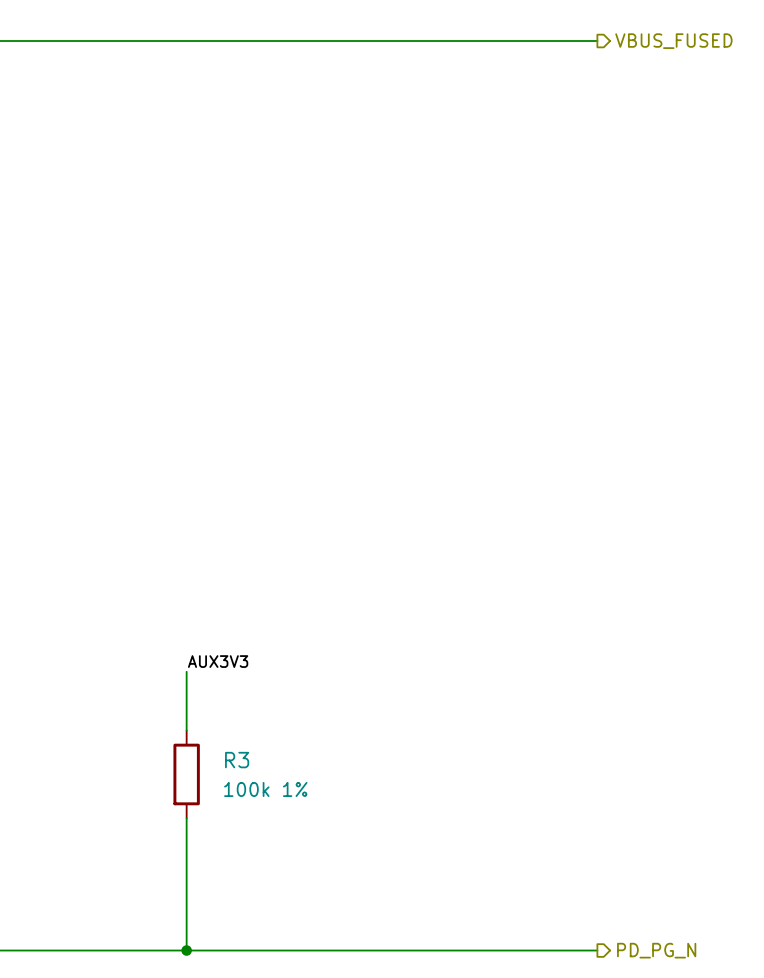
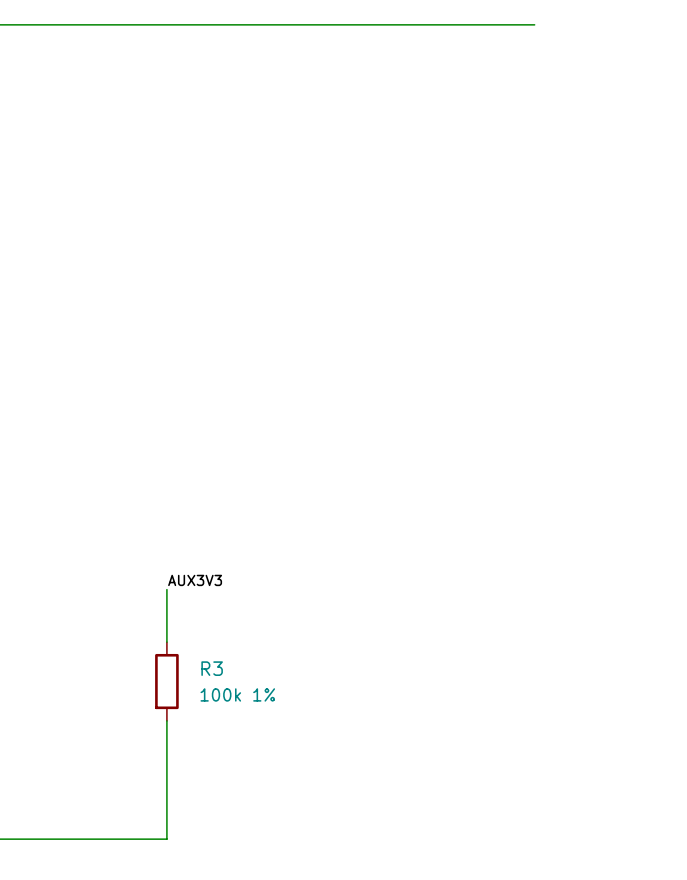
hierarchical label: VBUS_FUSED (673, 41) -> none
wire: (186, 950) (597, 950) -> none
junction: (186, 950) -> none
hierarchical label: PD_PG_N (656, 950) -> none

